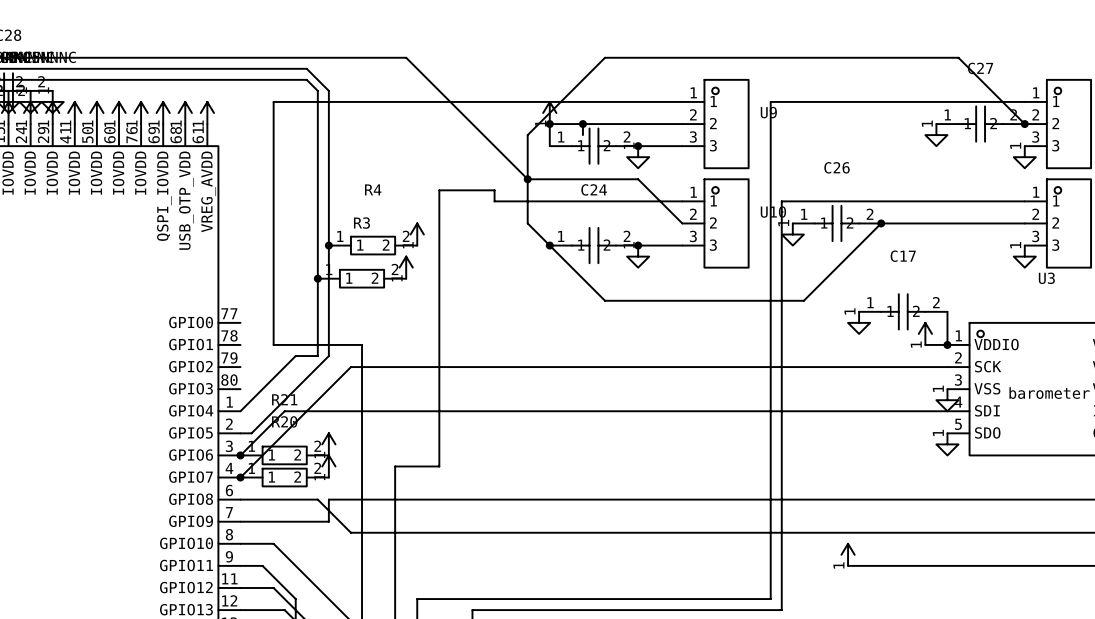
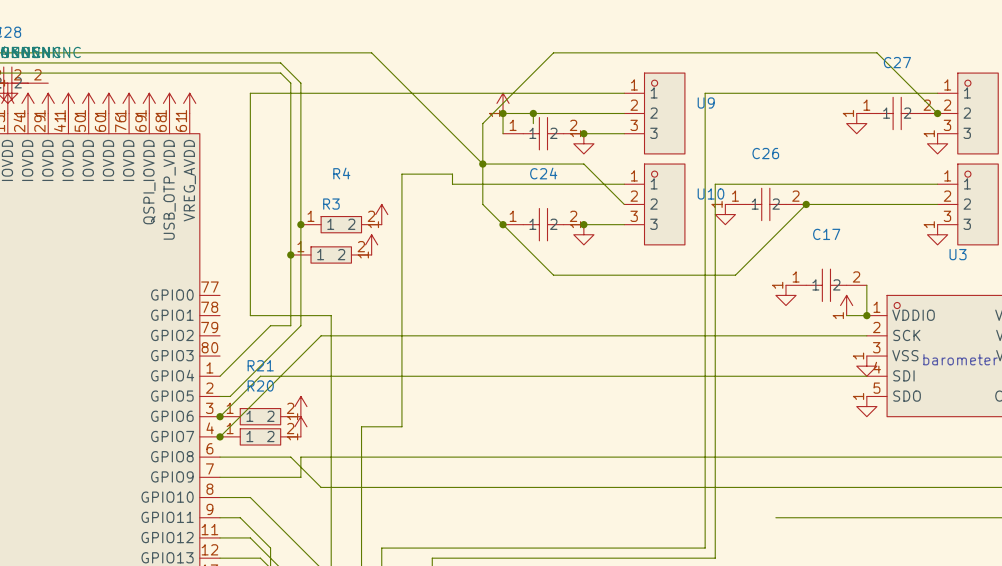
power symbol: (30, 101) -> none
power symbol: (52, 101) -> none
power symbol: (848, 554) -> none

